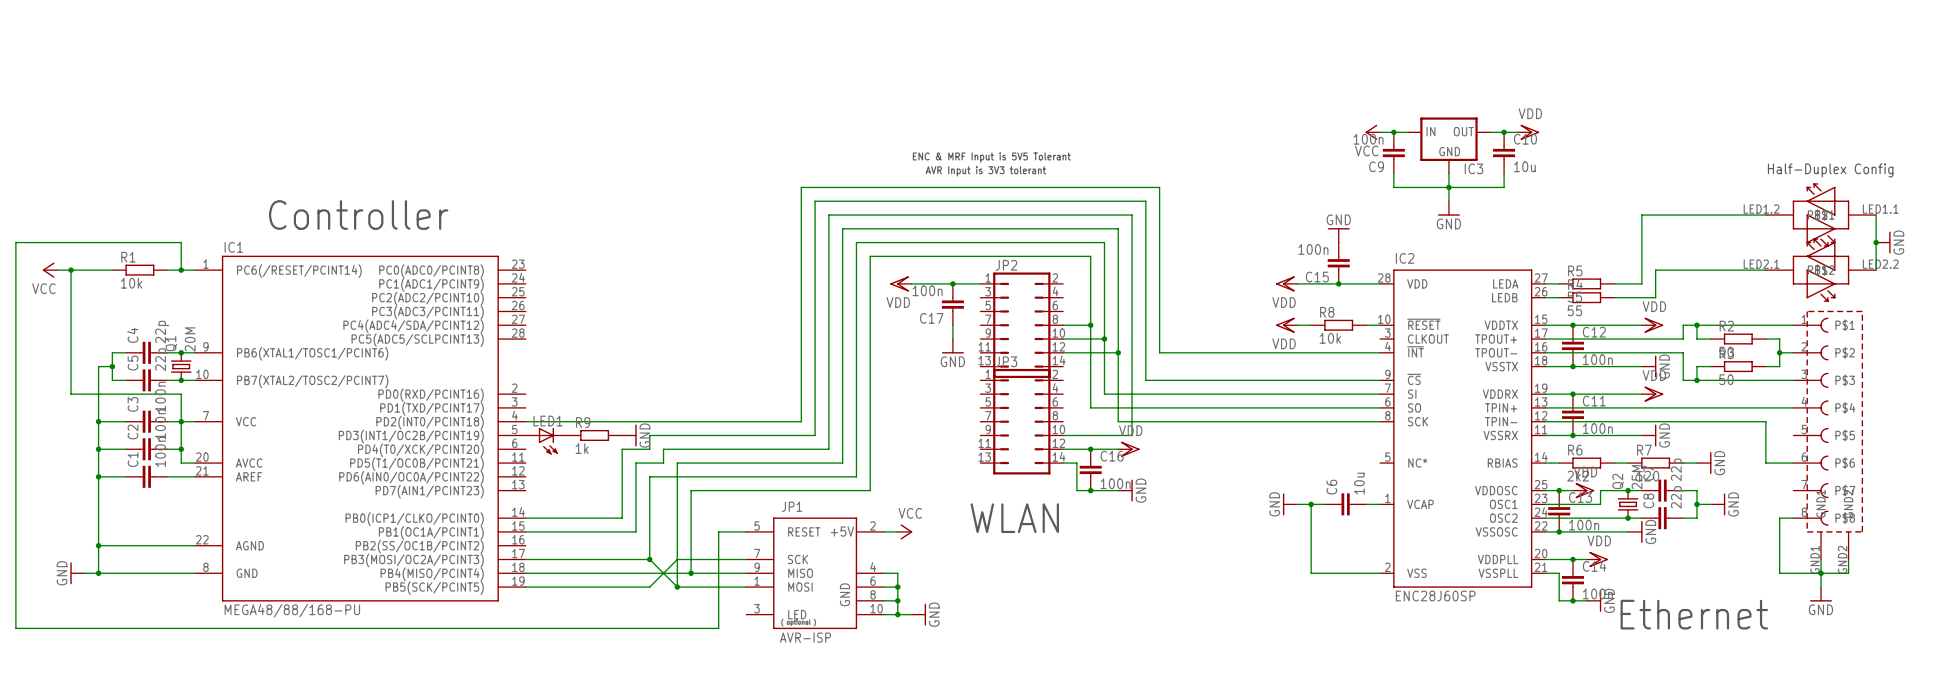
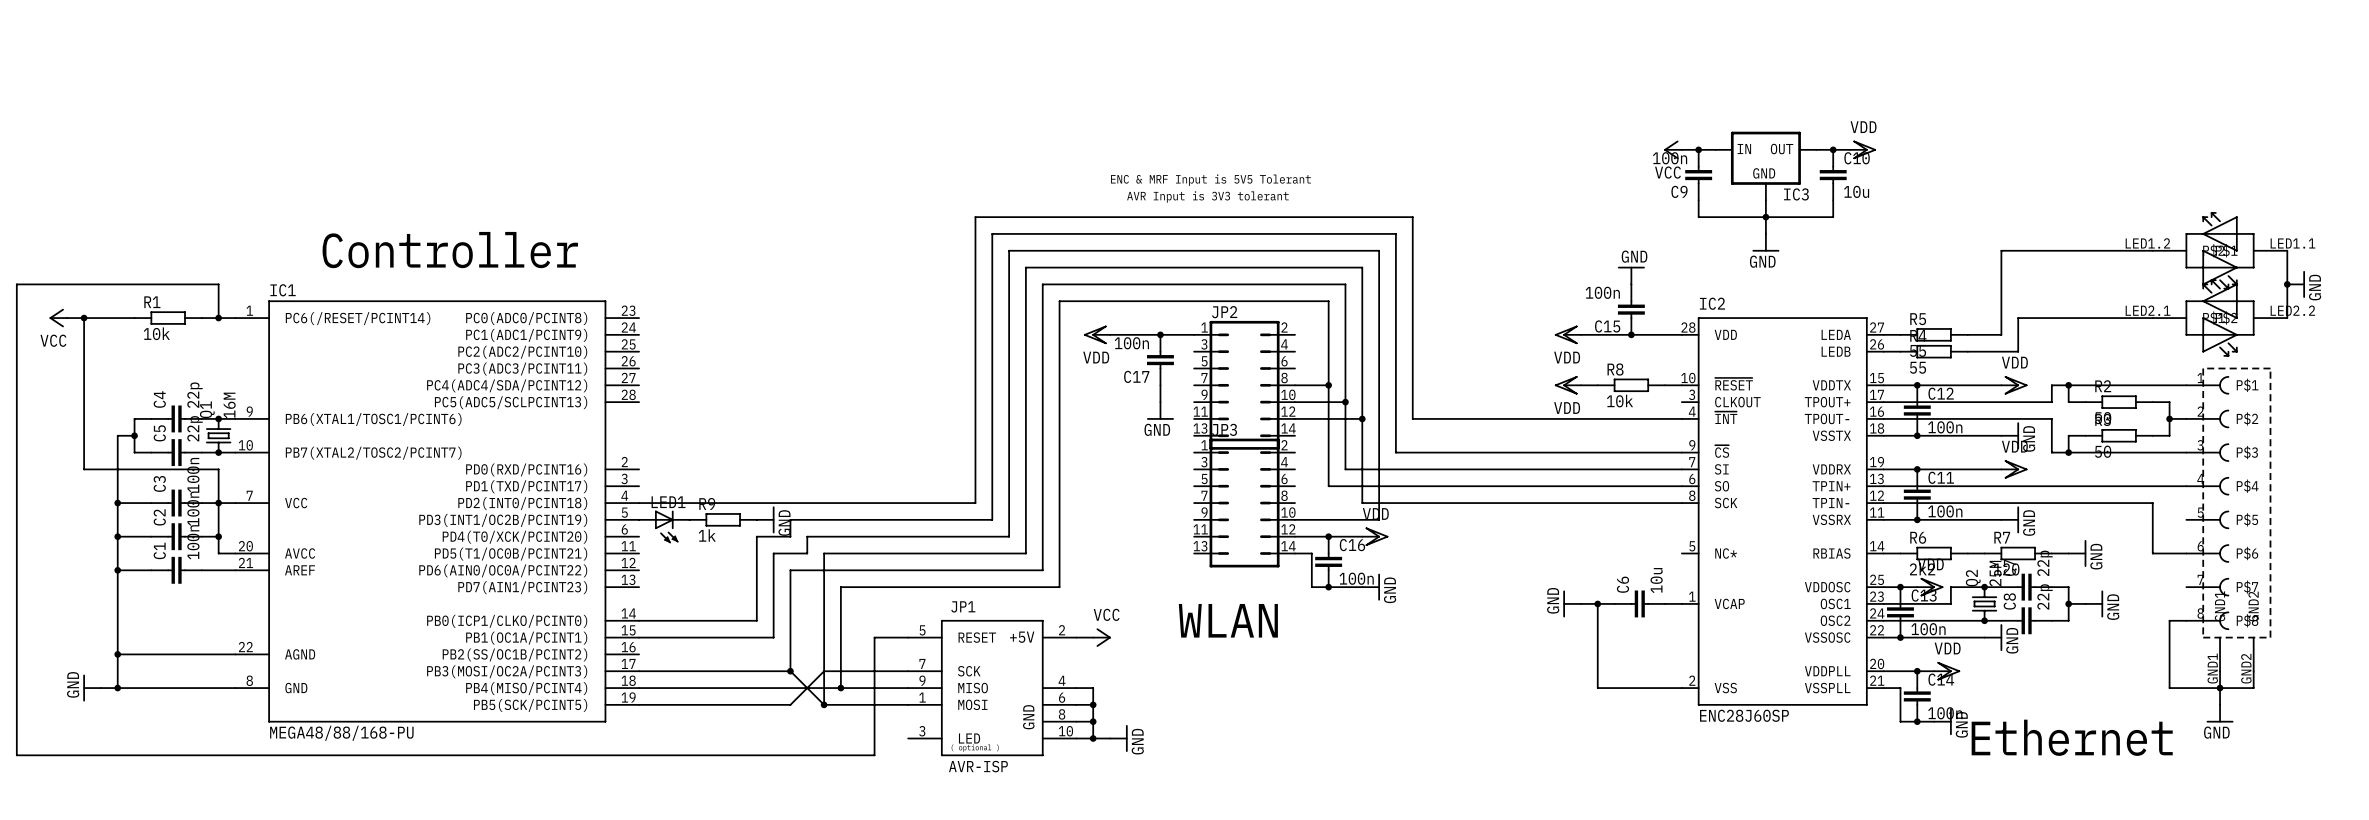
text: Half-Duplex Config (1830, 170) -> none
Q1 value: 20M (190, 339) -> 16M (229, 405)

